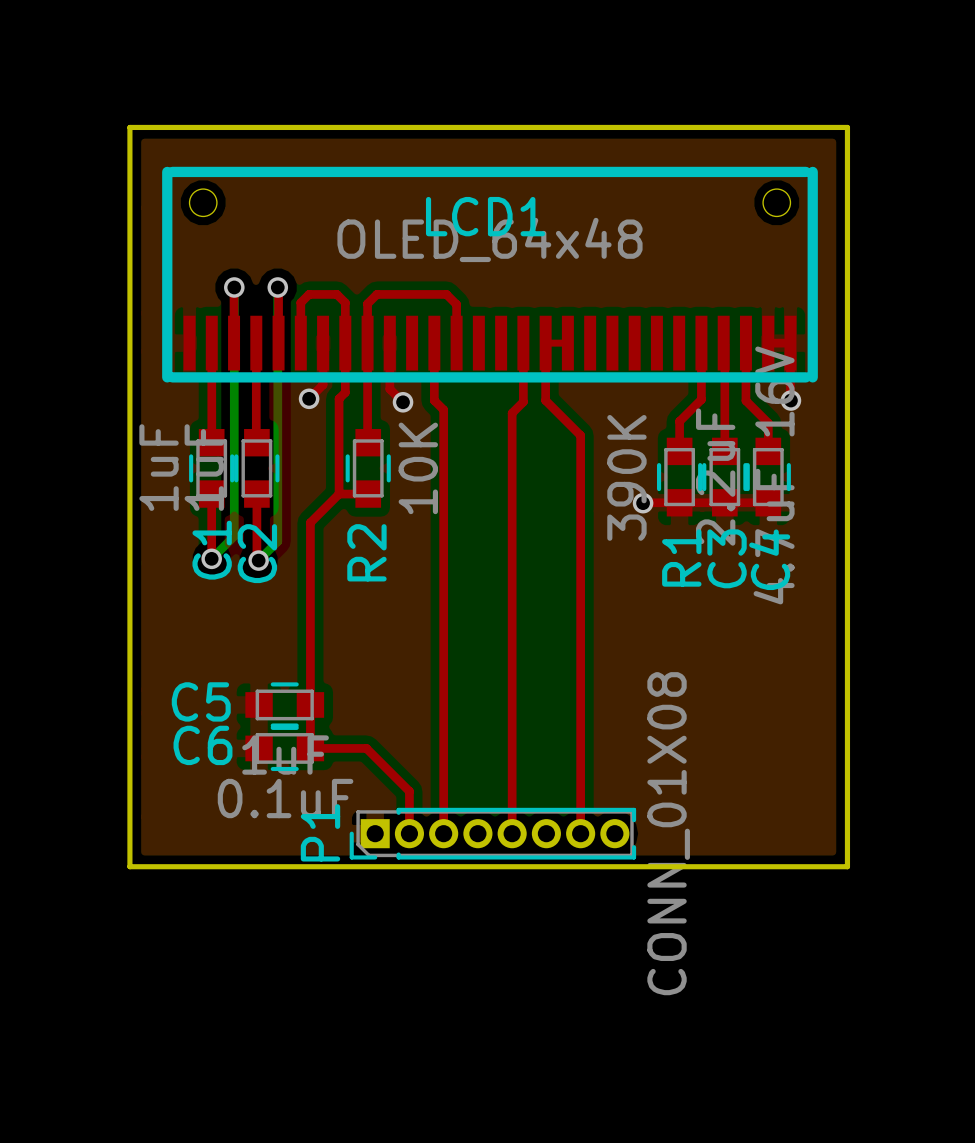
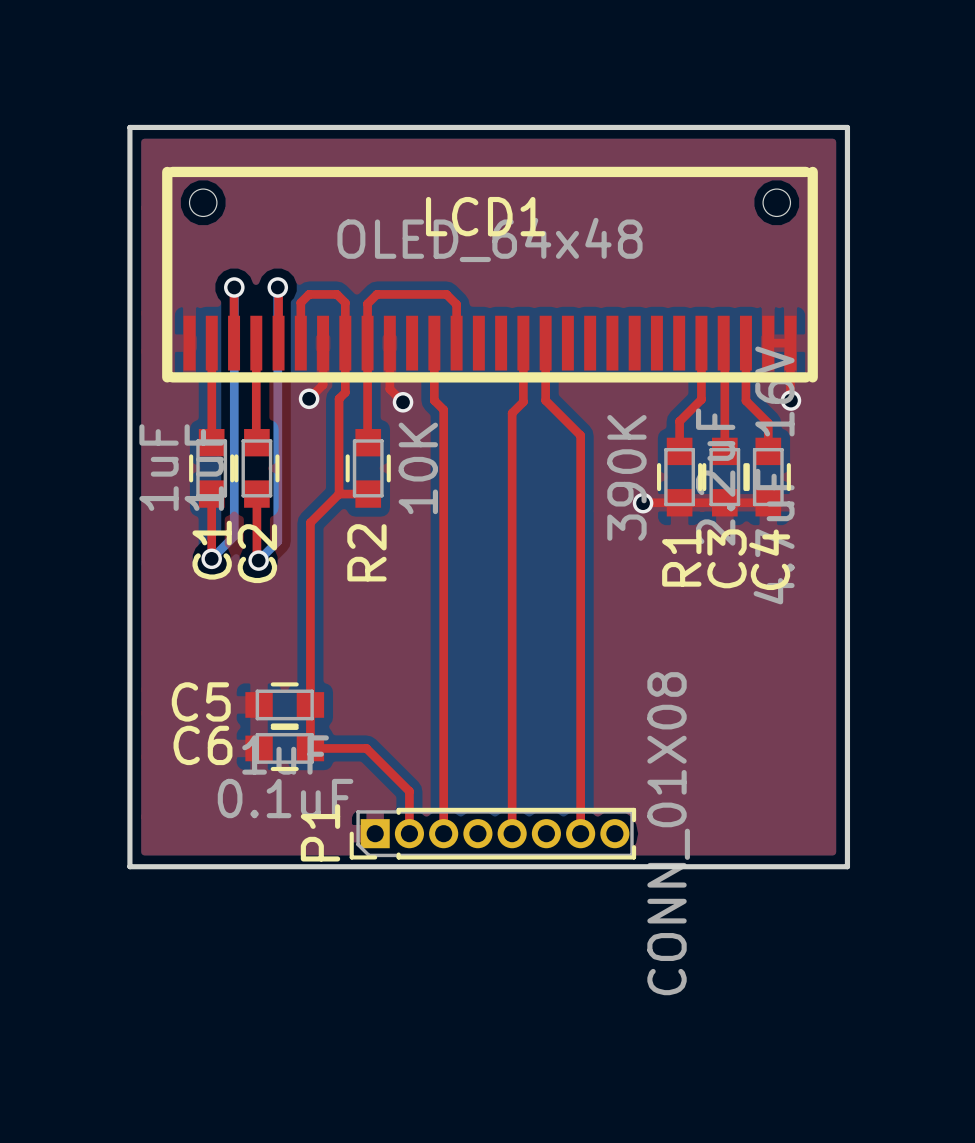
top track: (545, 343) (567, 343) -> none

